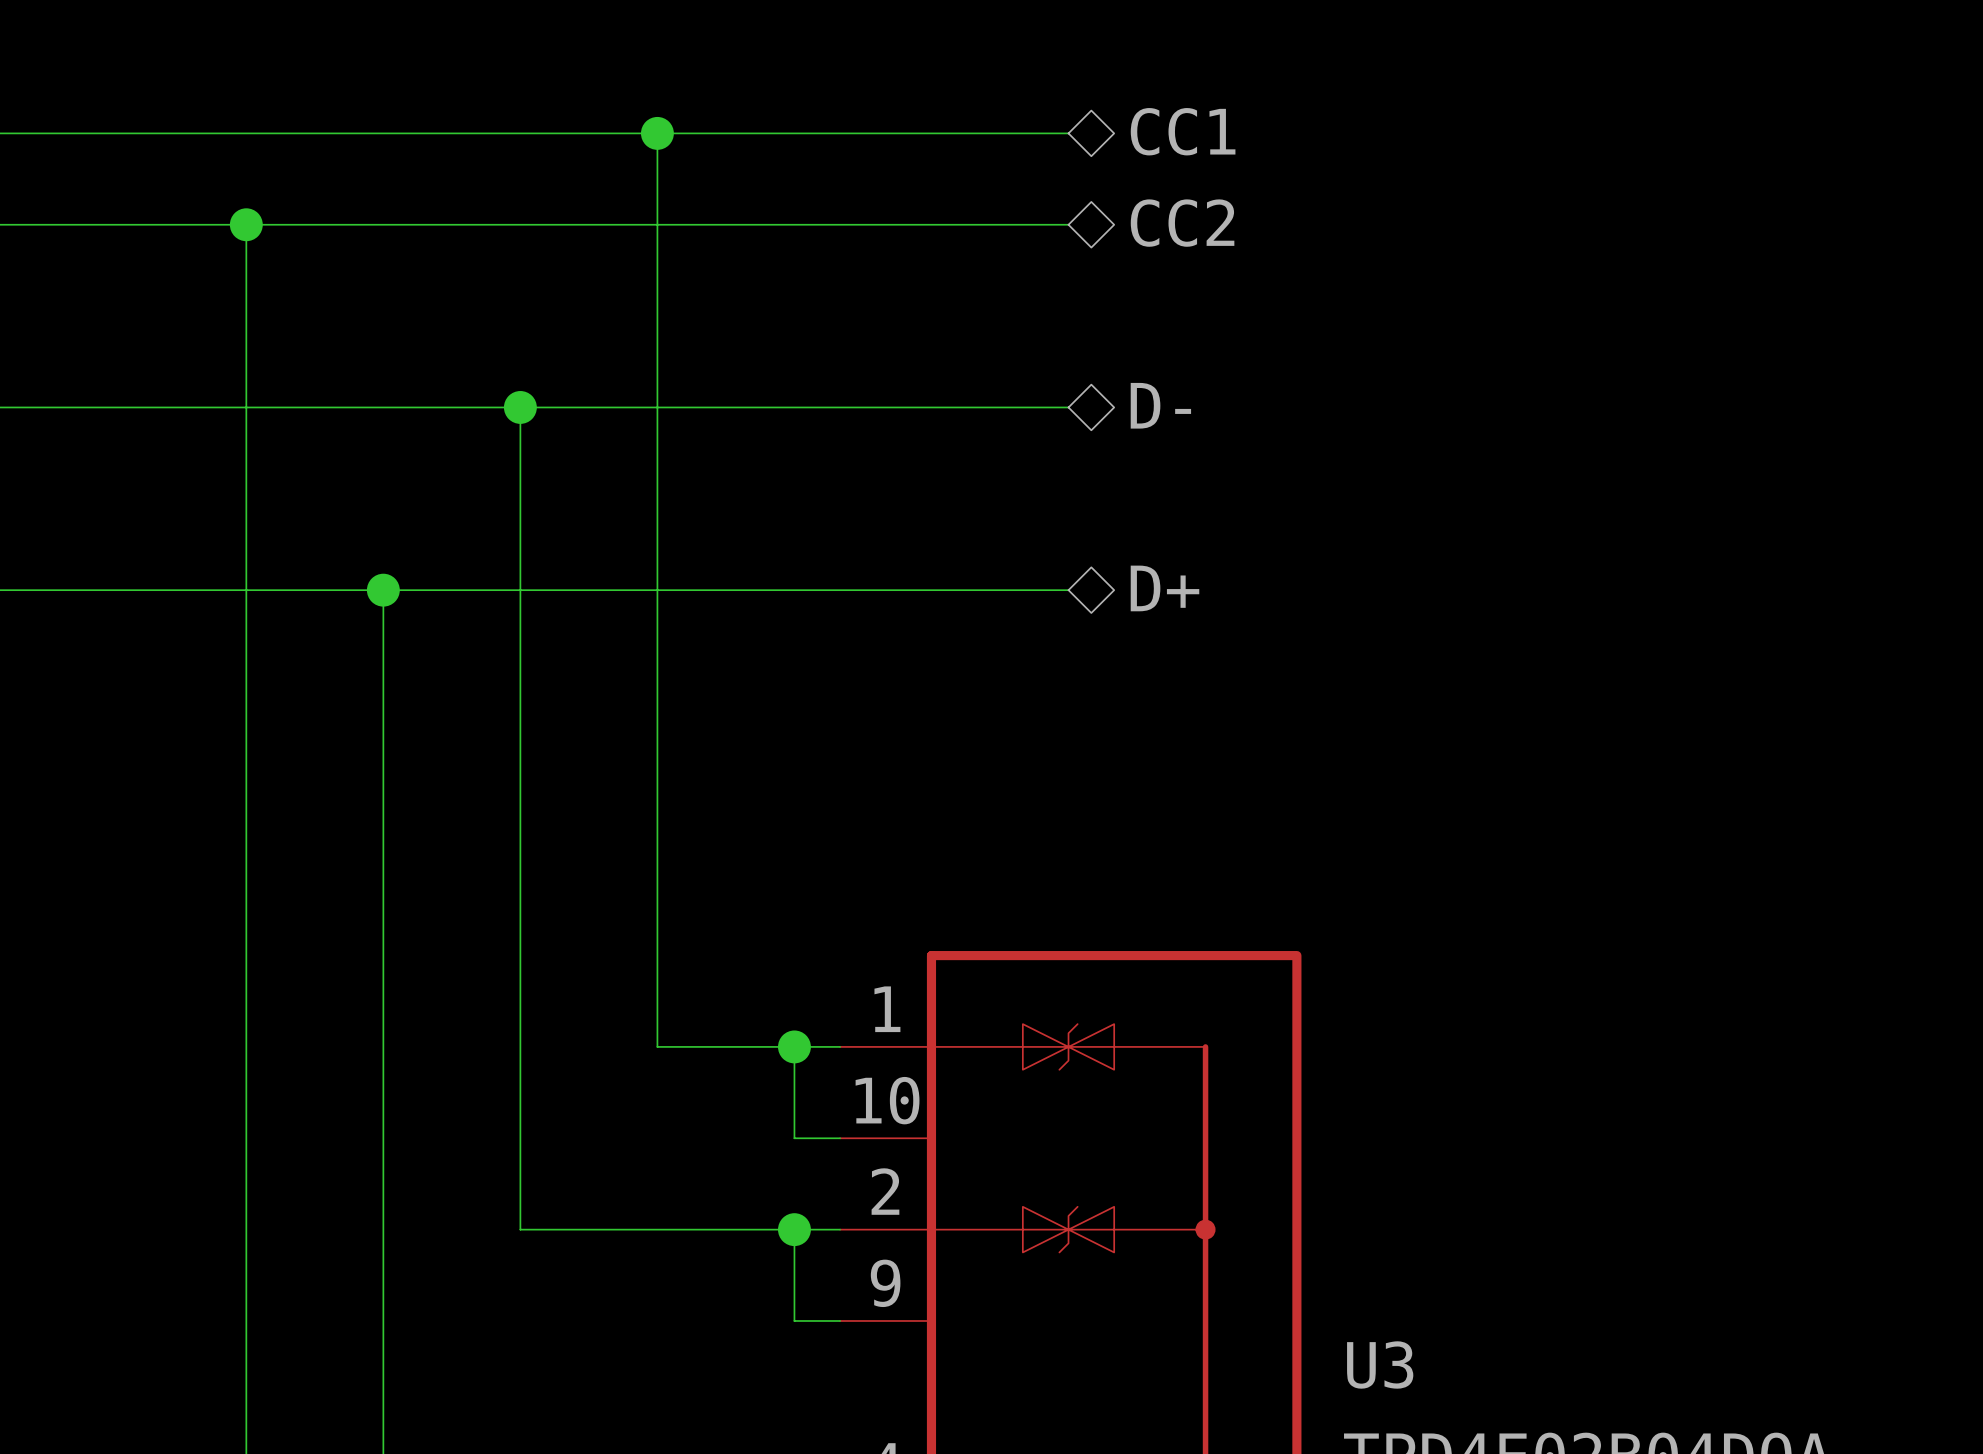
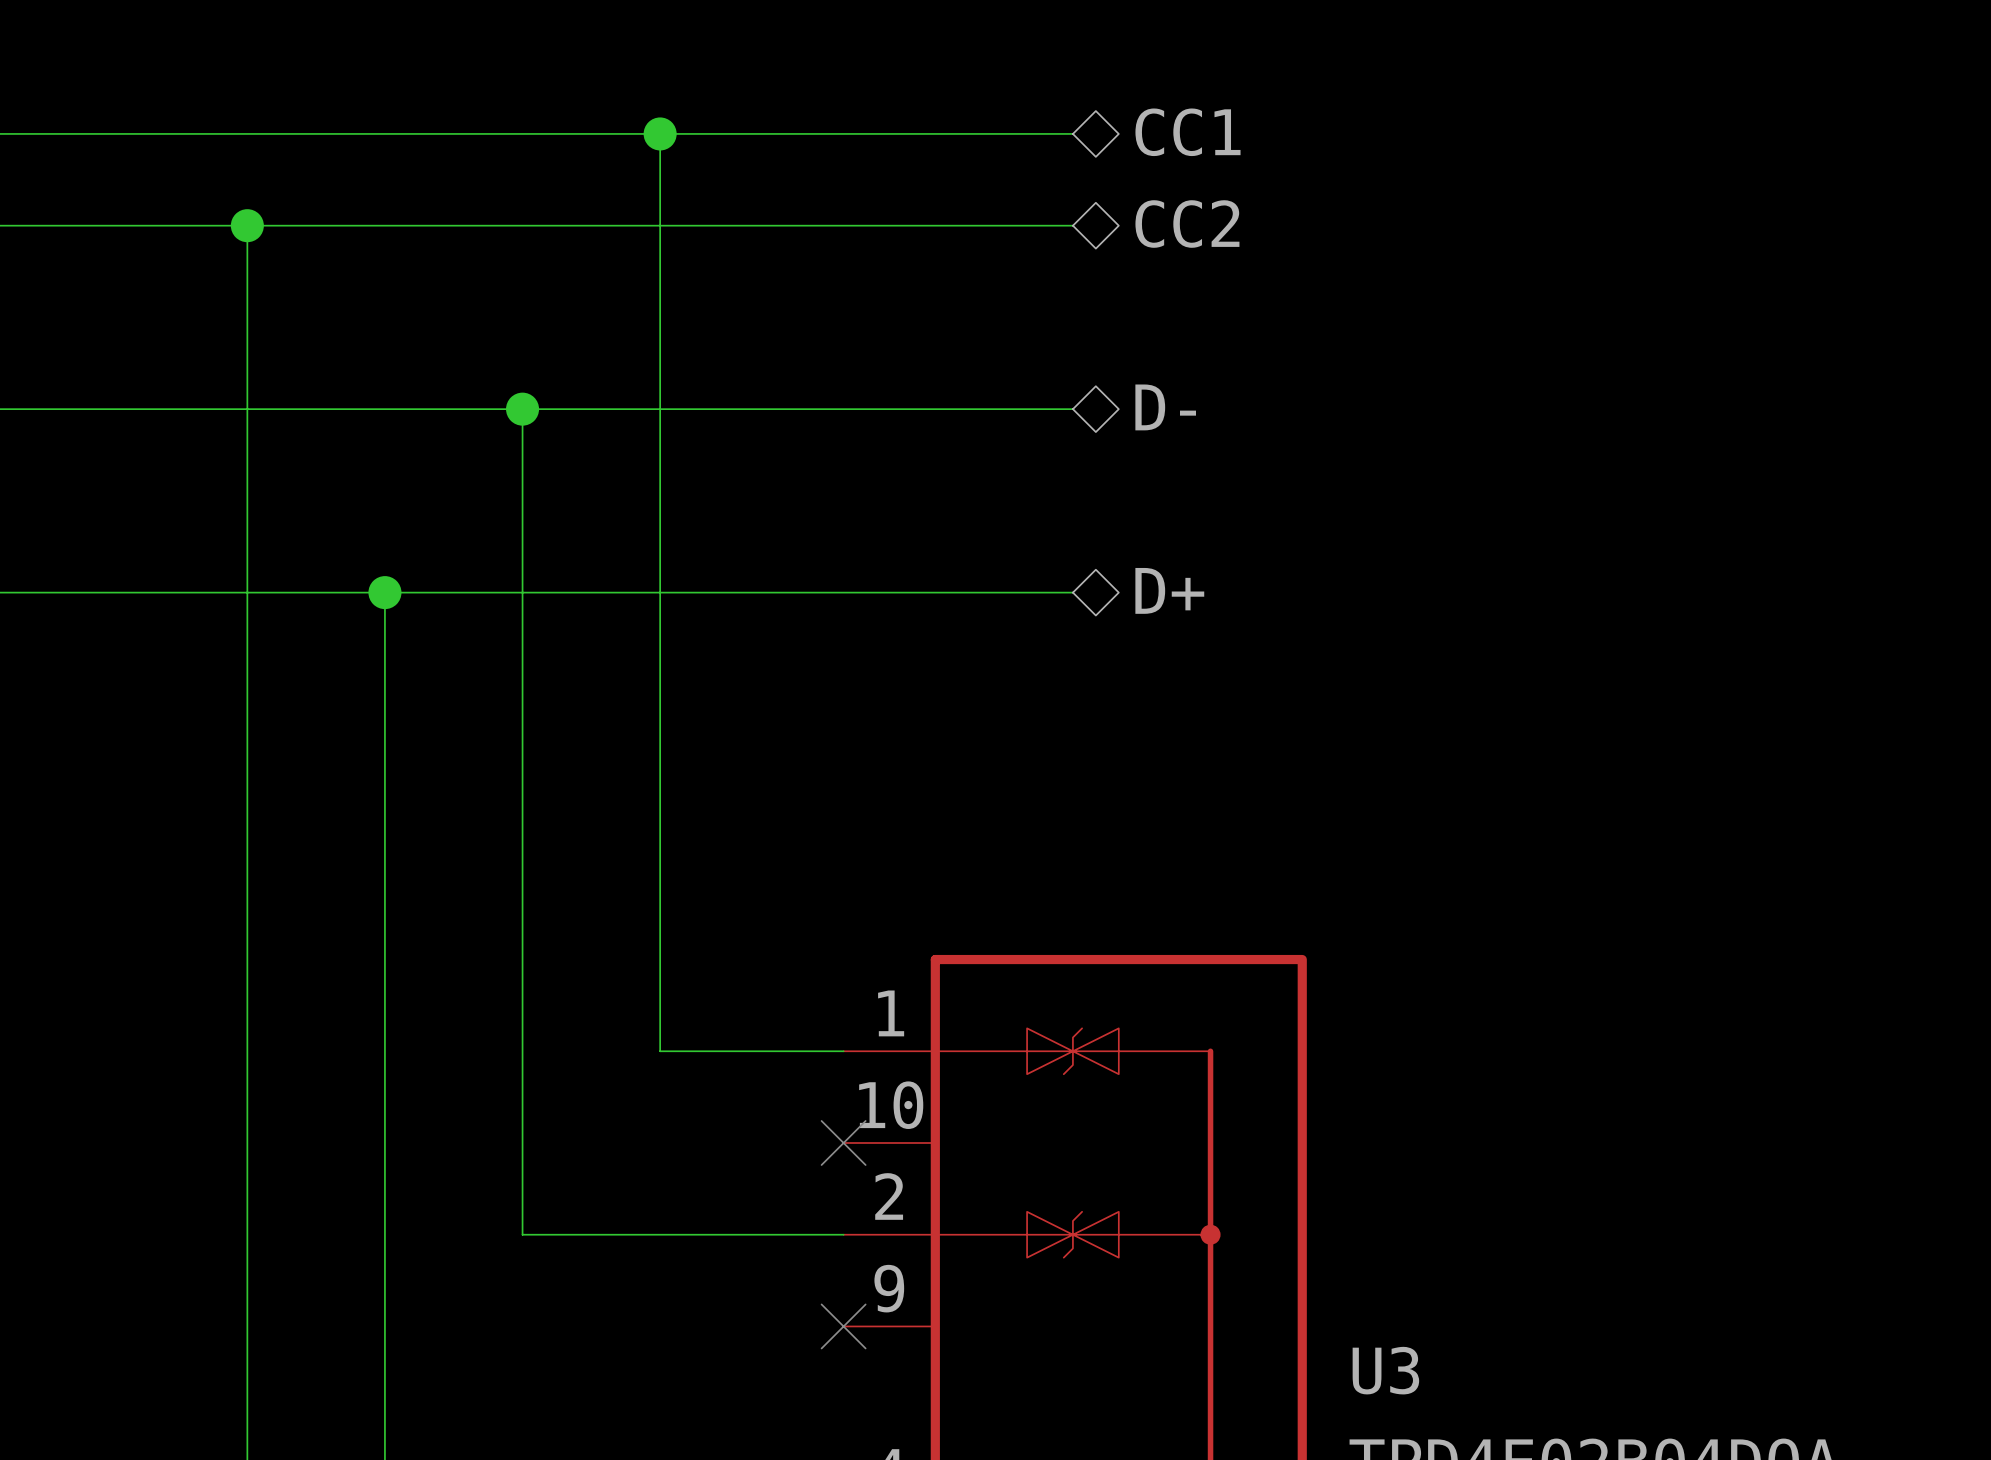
wire: (794, 1046) (794, 1138) (840, 1138) -> none
junction: (794, 1046) -> none
no-connect mark: none -> (843, 1142)
wire: (794, 1229) (794, 1320) (840, 1320) -> none
junction: (794, 1229) -> none
no-connect mark: none -> (843, 1326)

